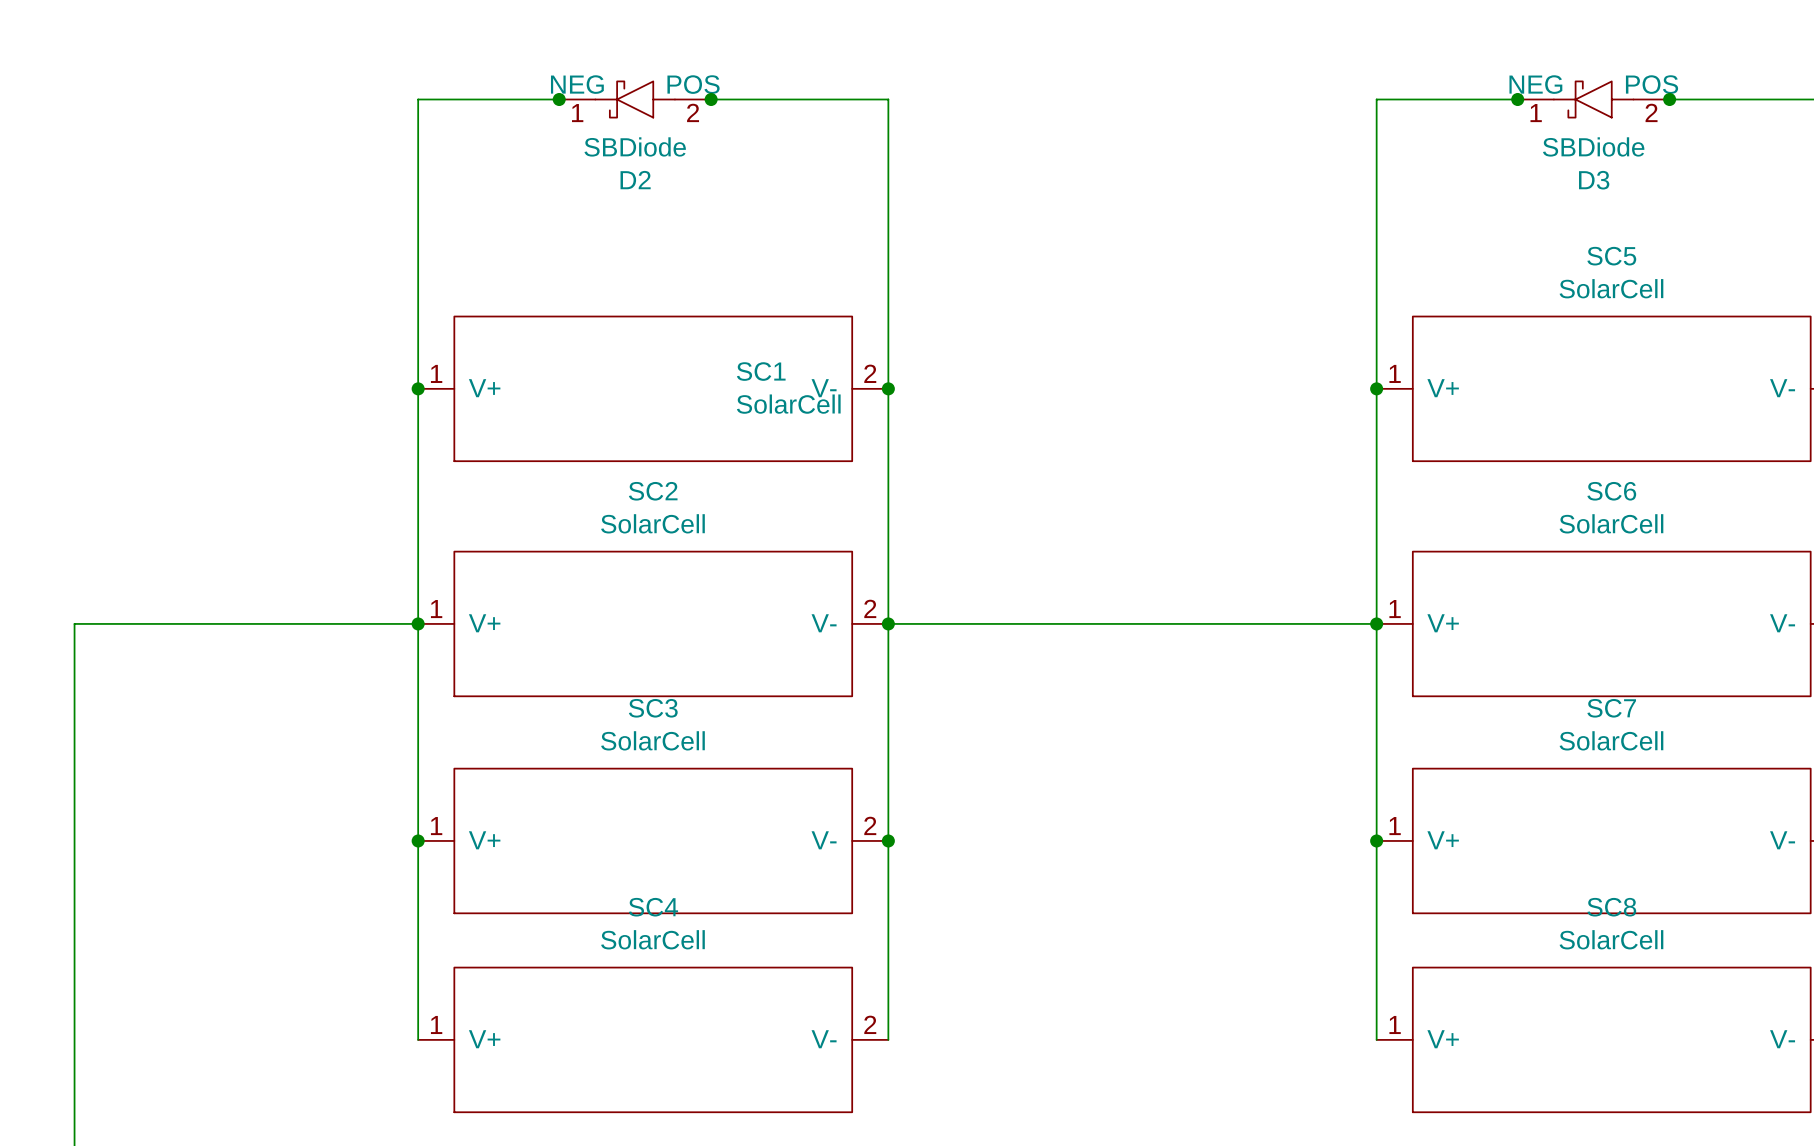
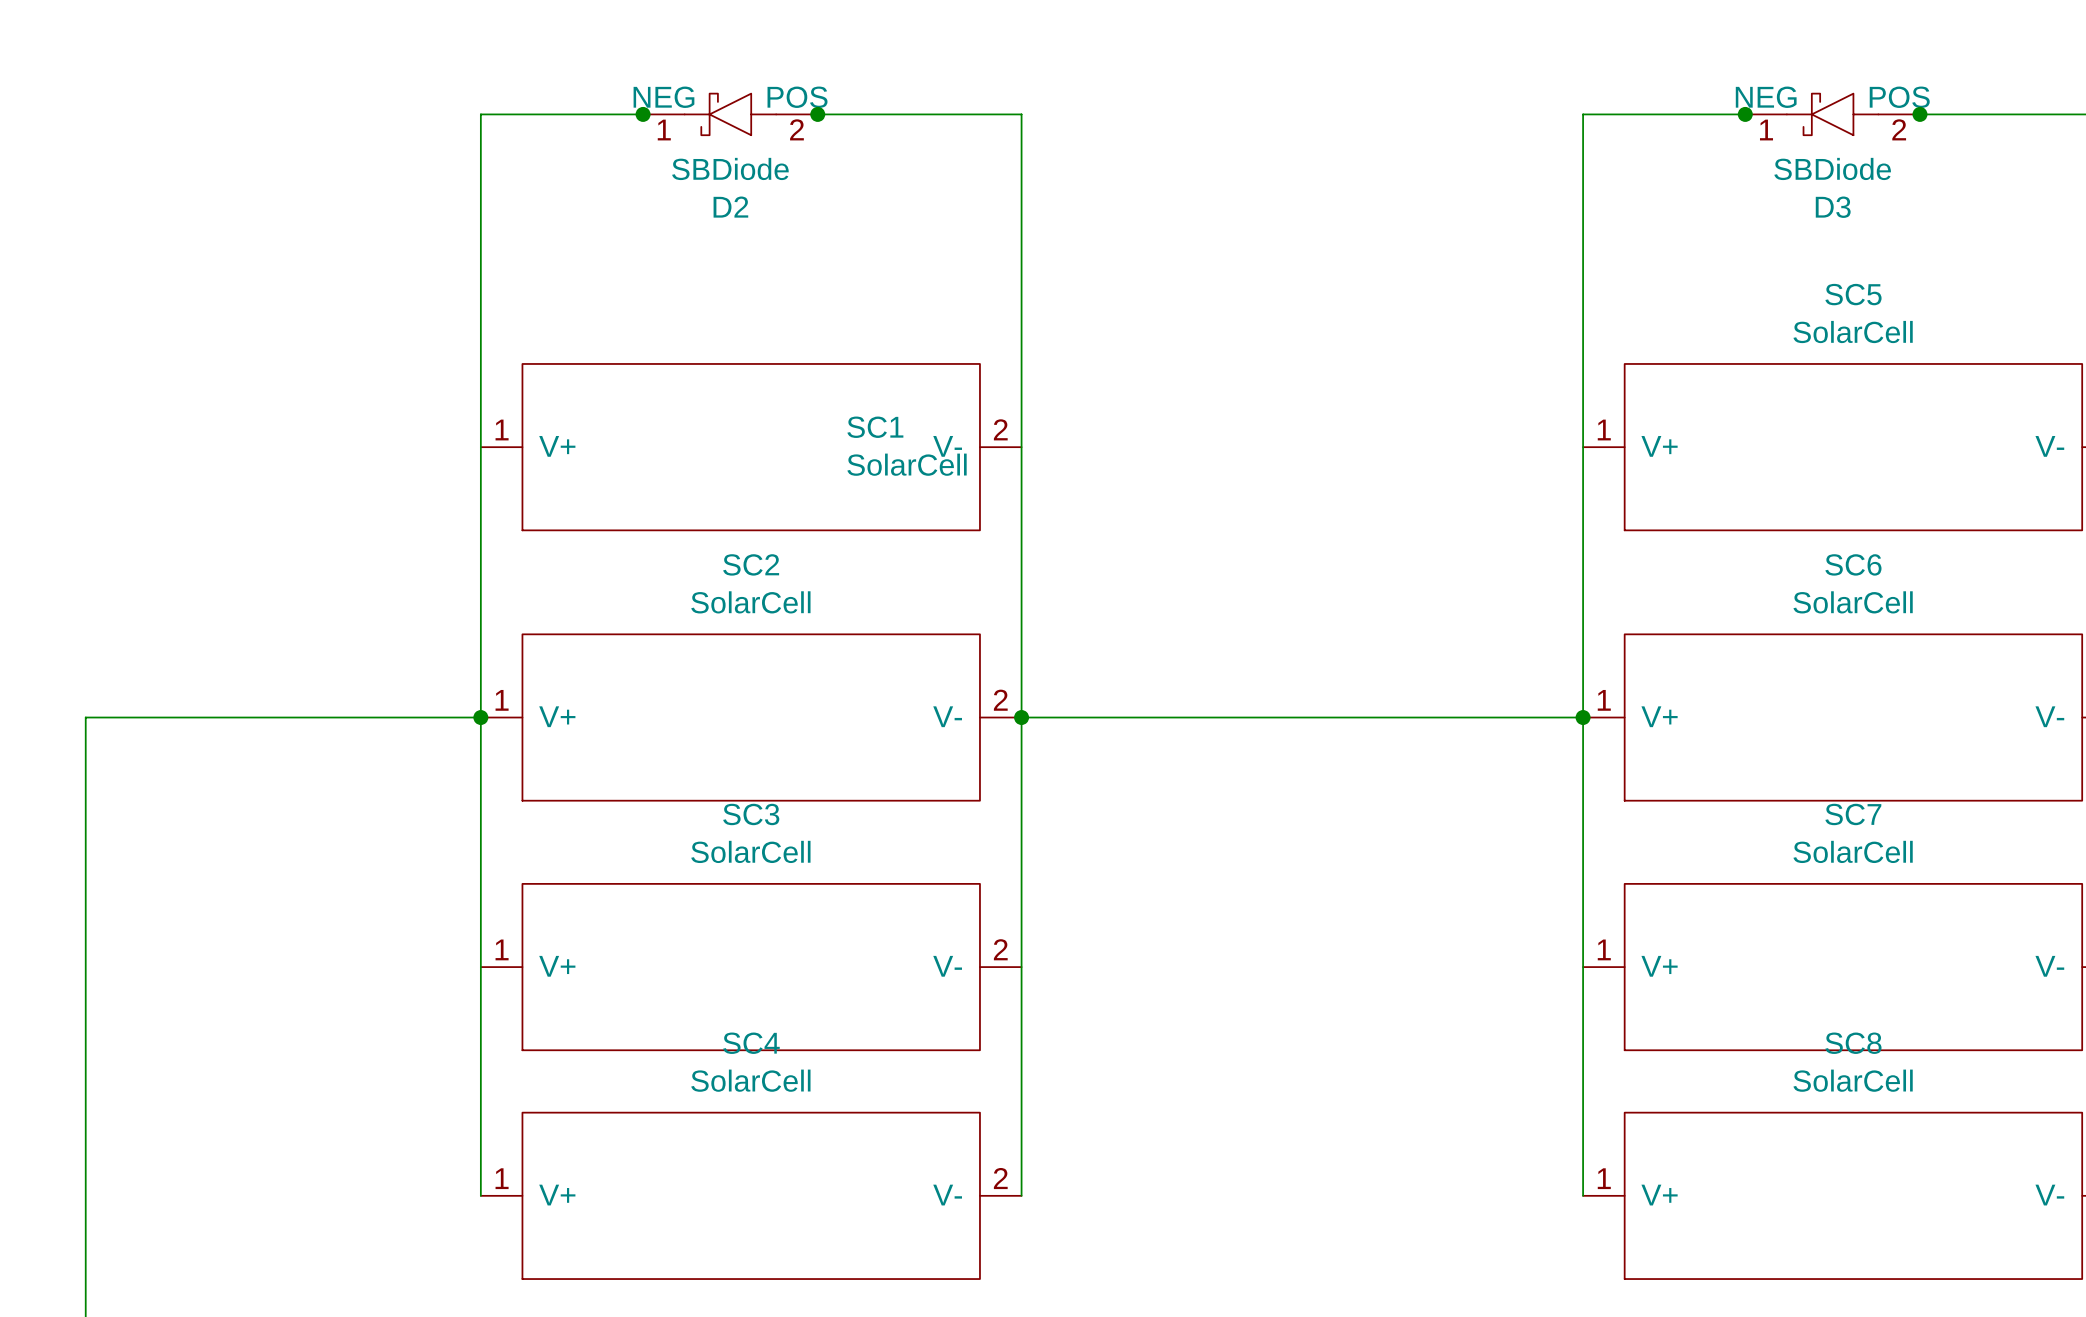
junction: (418, 388) -> none
junction: (888, 388) -> none
junction: (1376, 388) -> none
junction: (418, 840) -> none
junction: (888, 840) -> none
junction: (1376, 840) -> none

